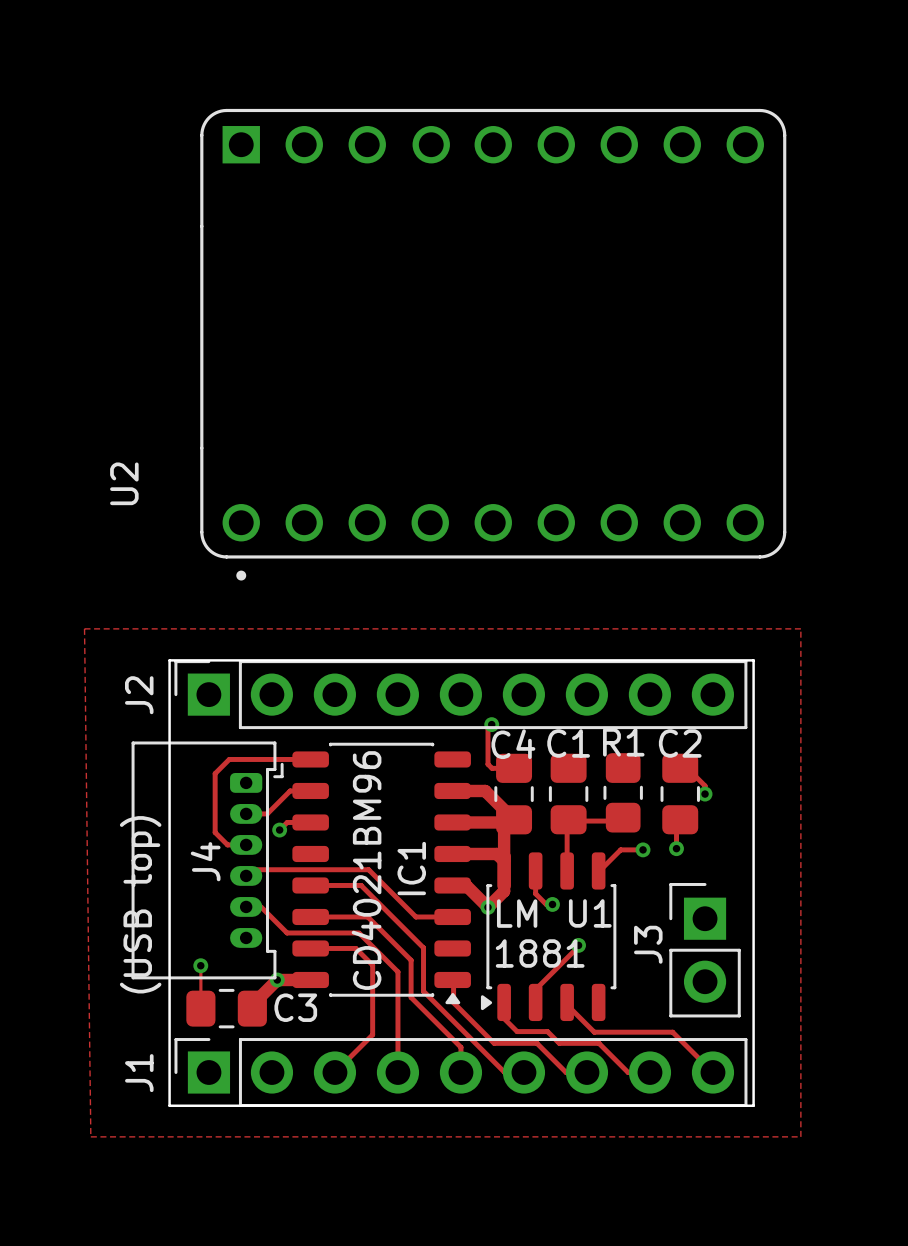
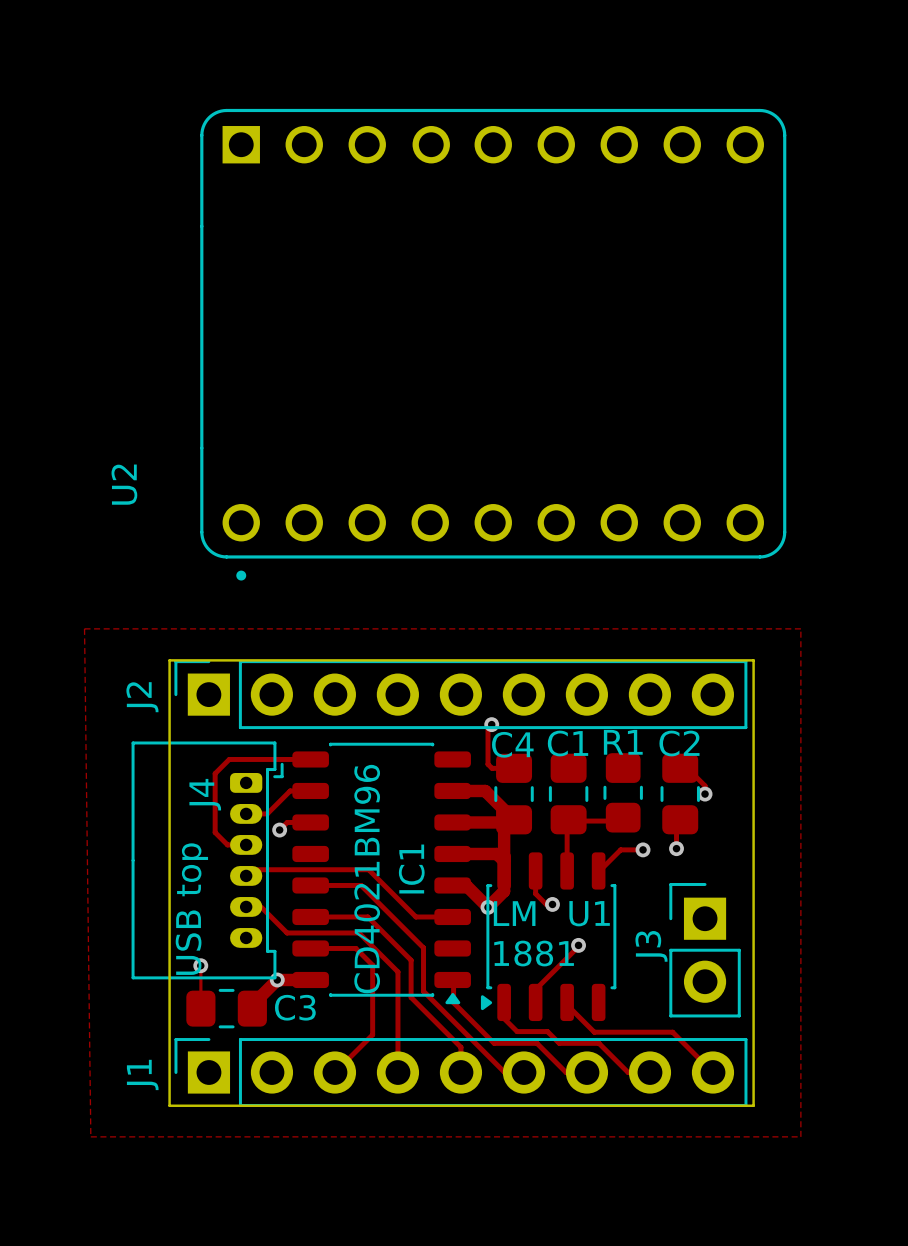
J4 name position: J4 (205, 861) -> J4 (205, 794)
text: (USB top) (140, 904) -> USB top (191, 909)

